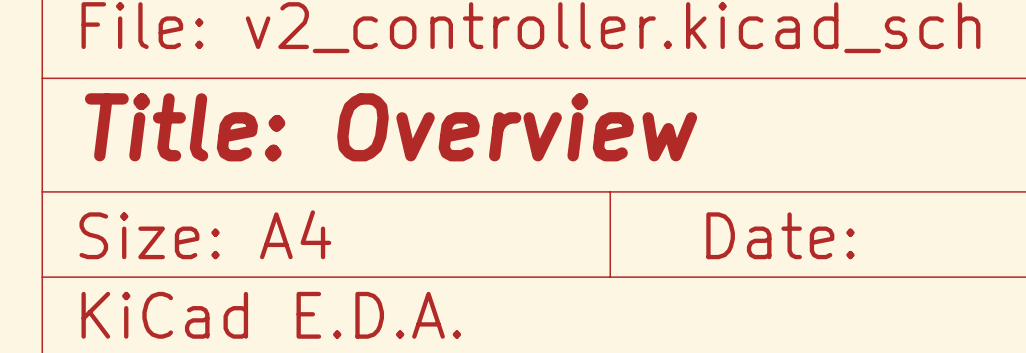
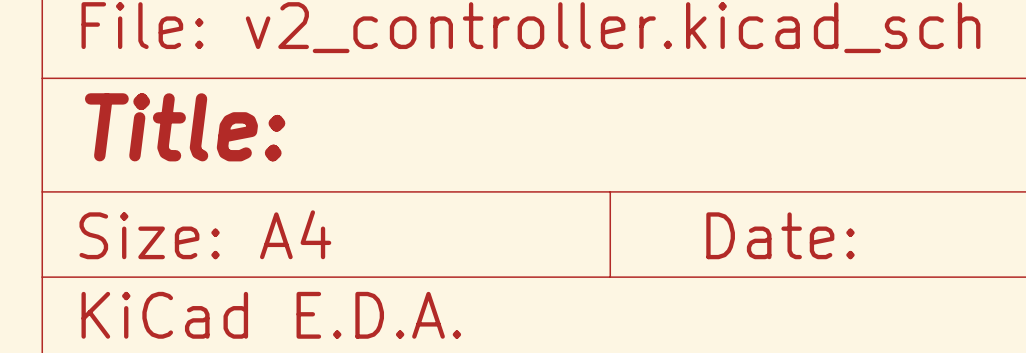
title block: Title: Overview (391, 127) -> Title: (185, 127)

